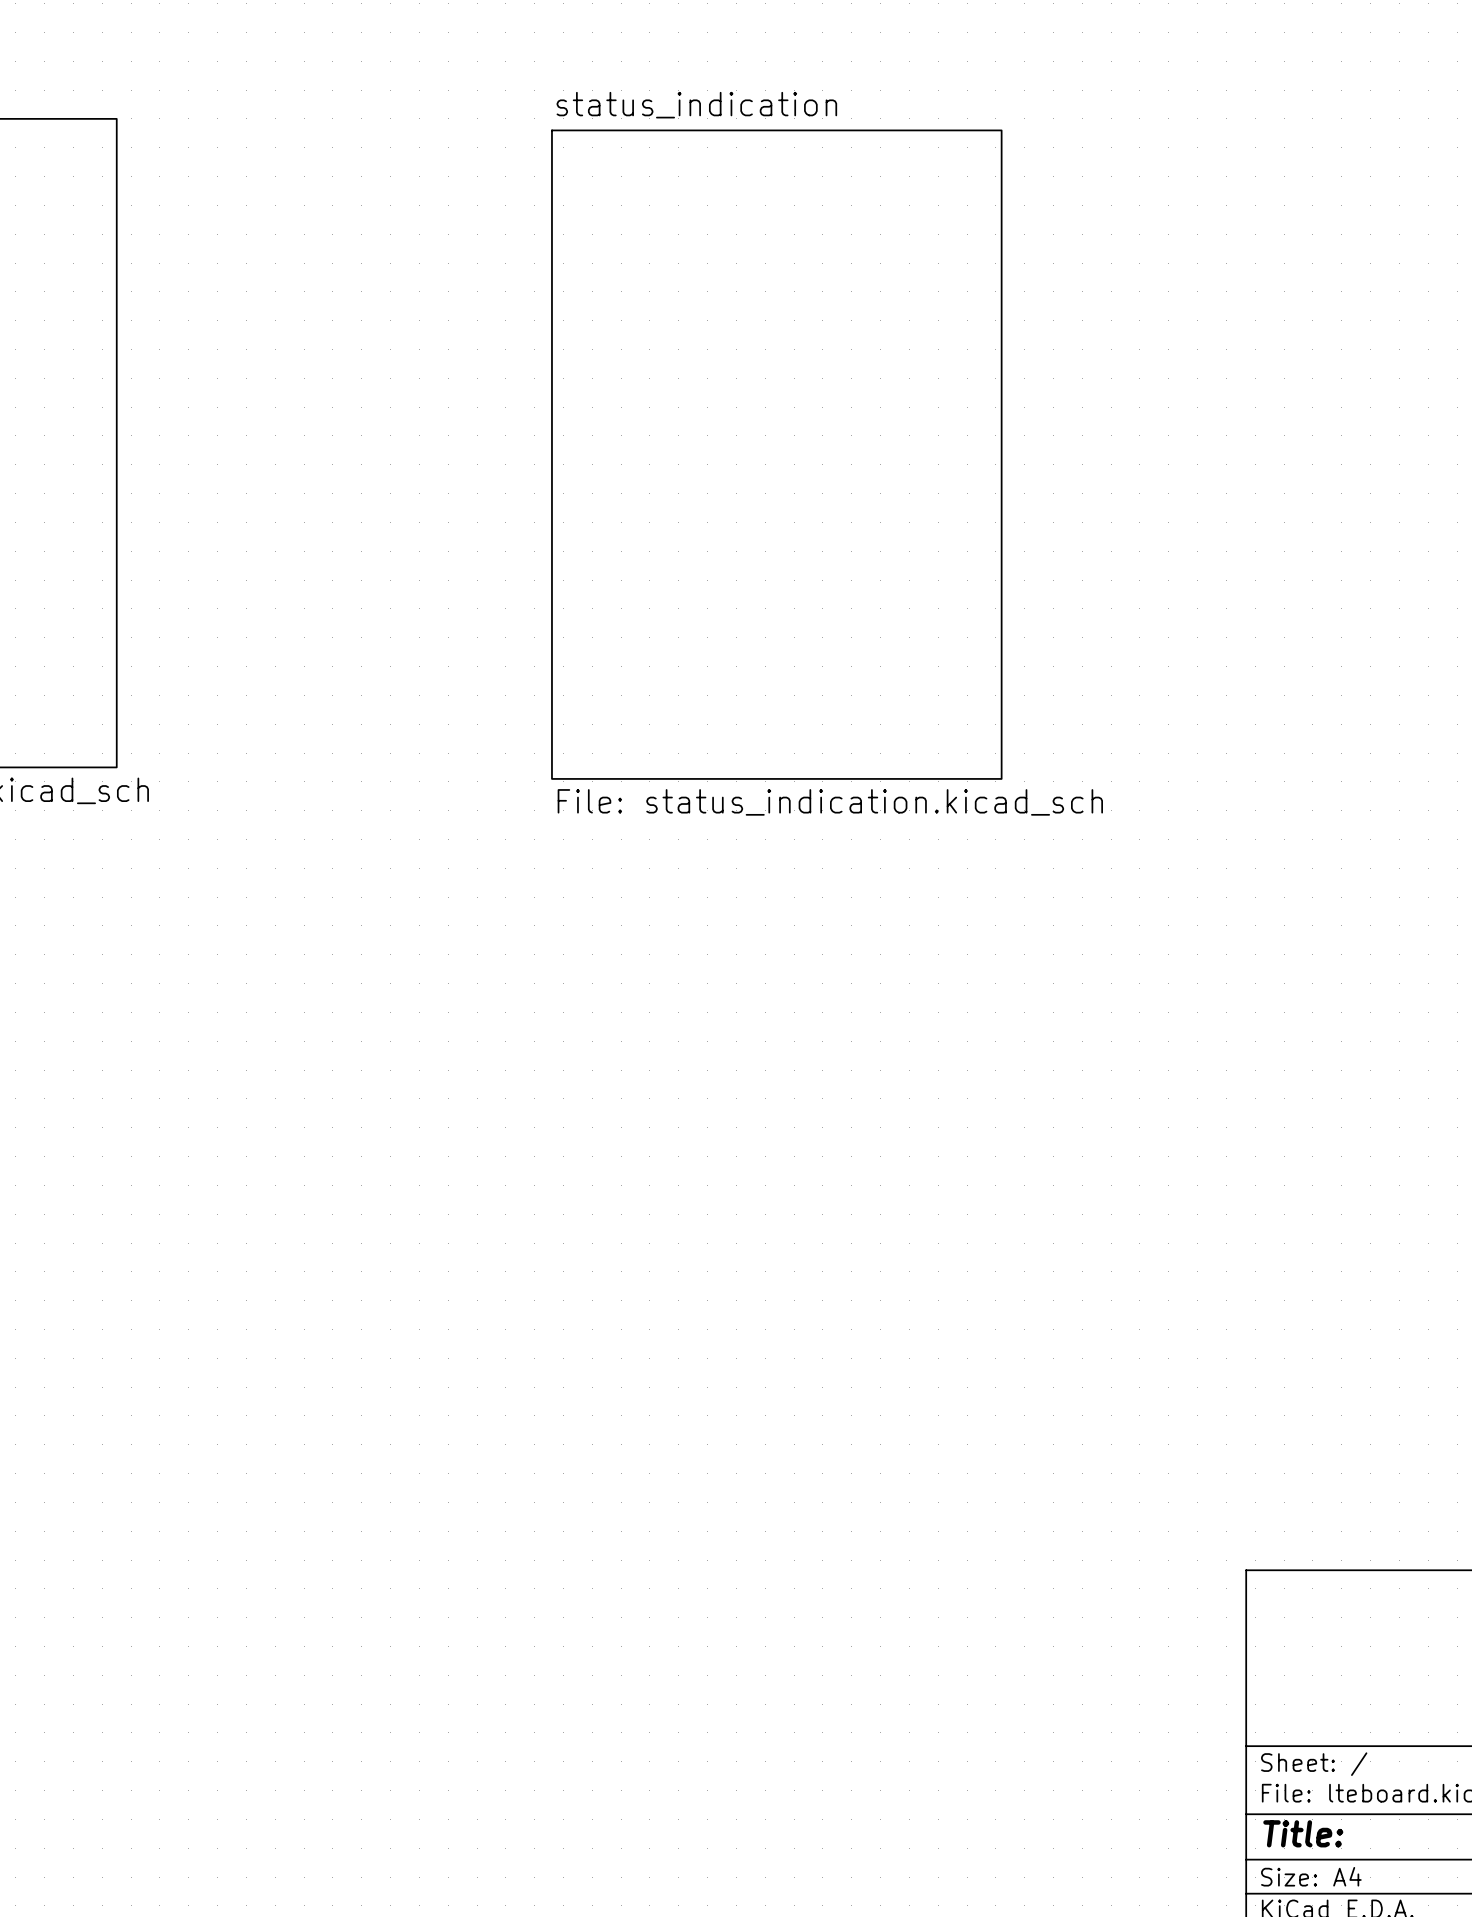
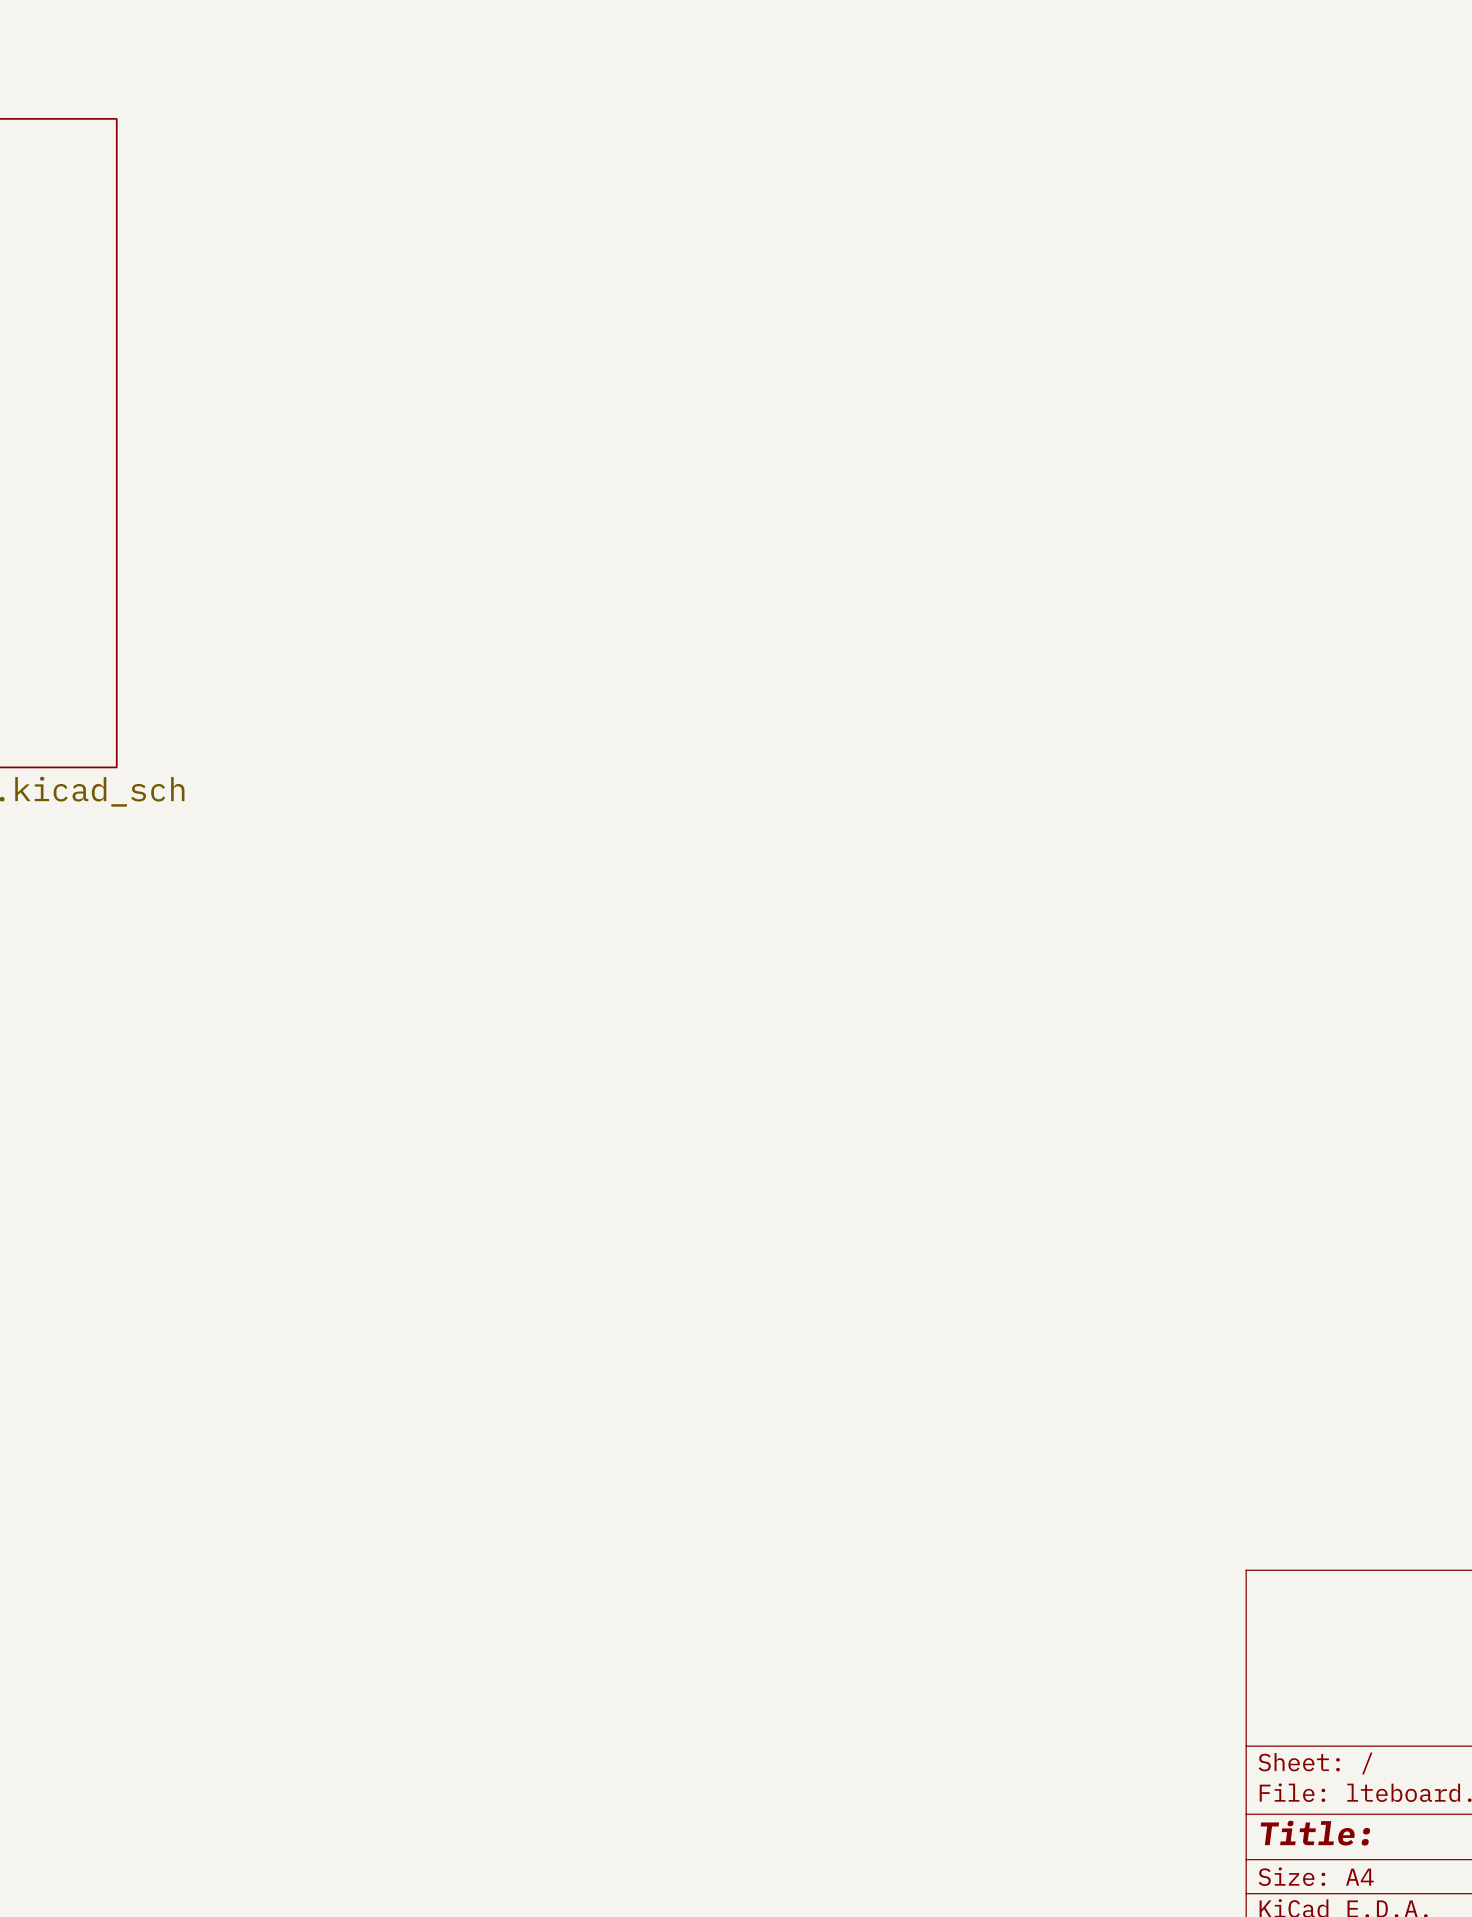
sheet status_indication: File: status_indication.kicad_sch (776, 454) -> none

